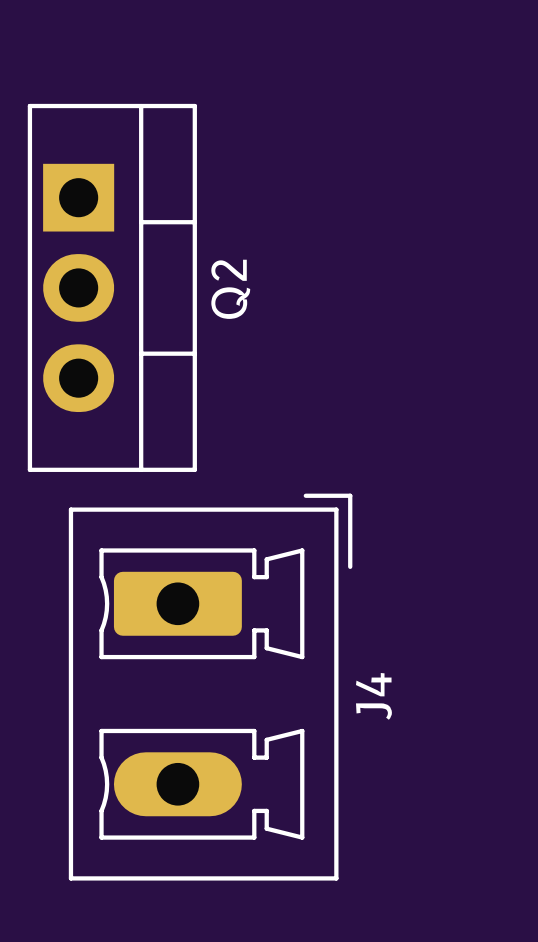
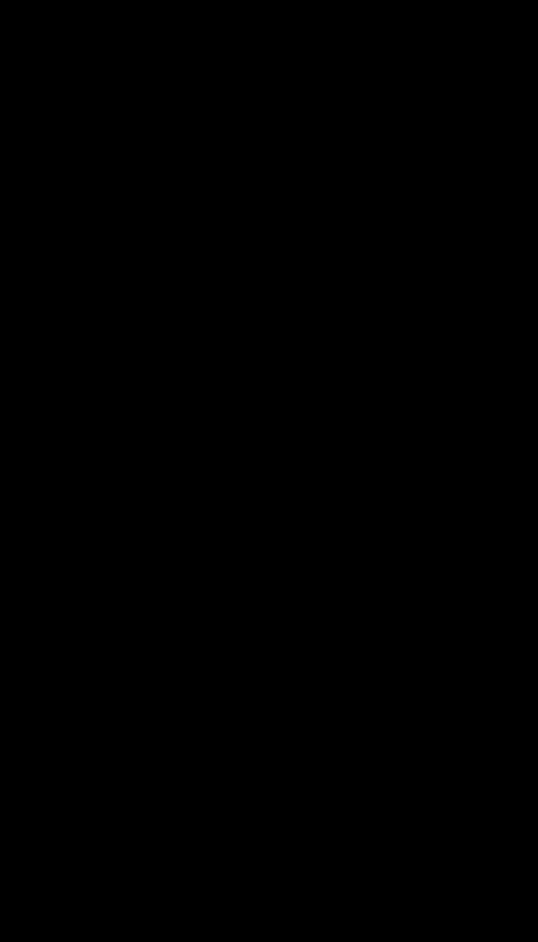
Q2: (112, 287) -> none
J4: (210, 687) -> none

